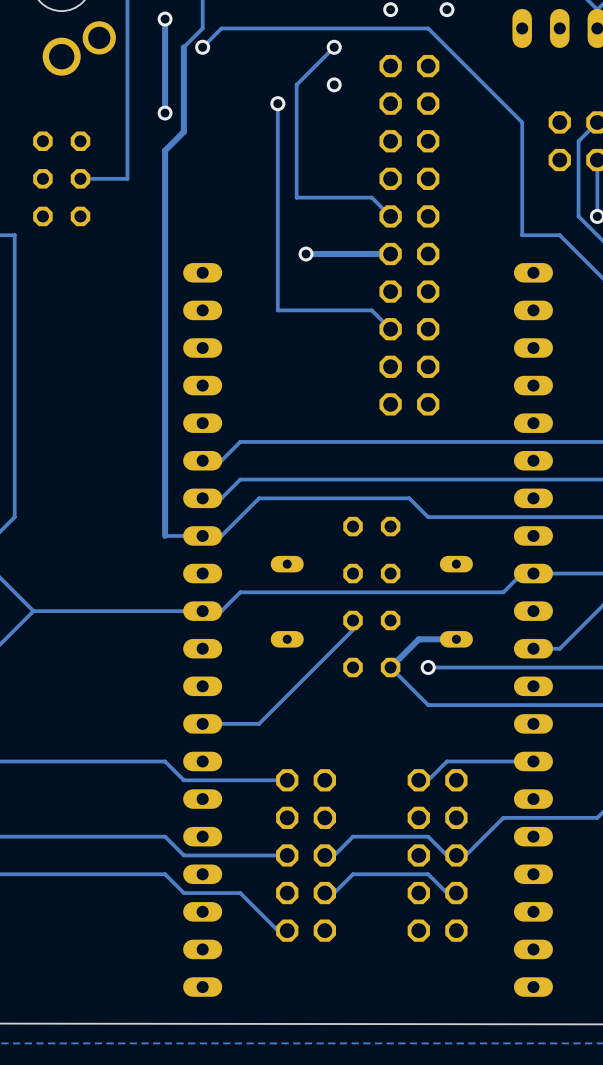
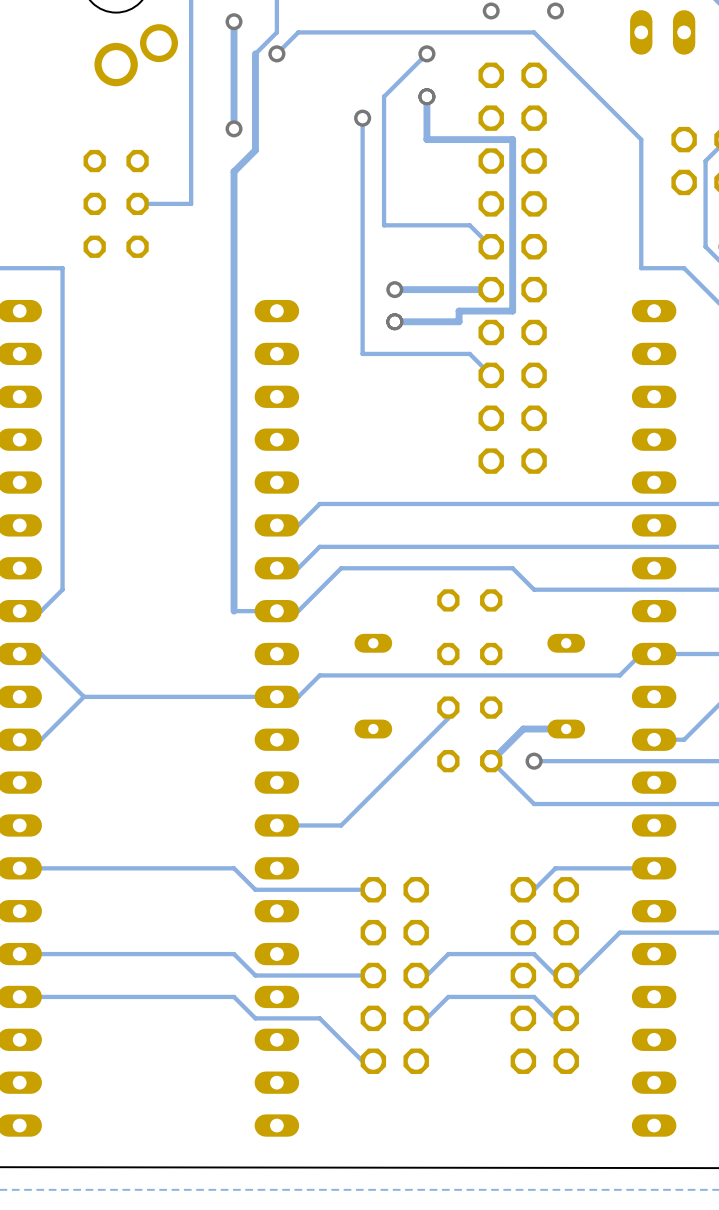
track: none -> (426, 96) (426, 139) (512, 139) (512, 311) (459, 311) (459, 321) (394, 321)
via: none -> (394, 321)

